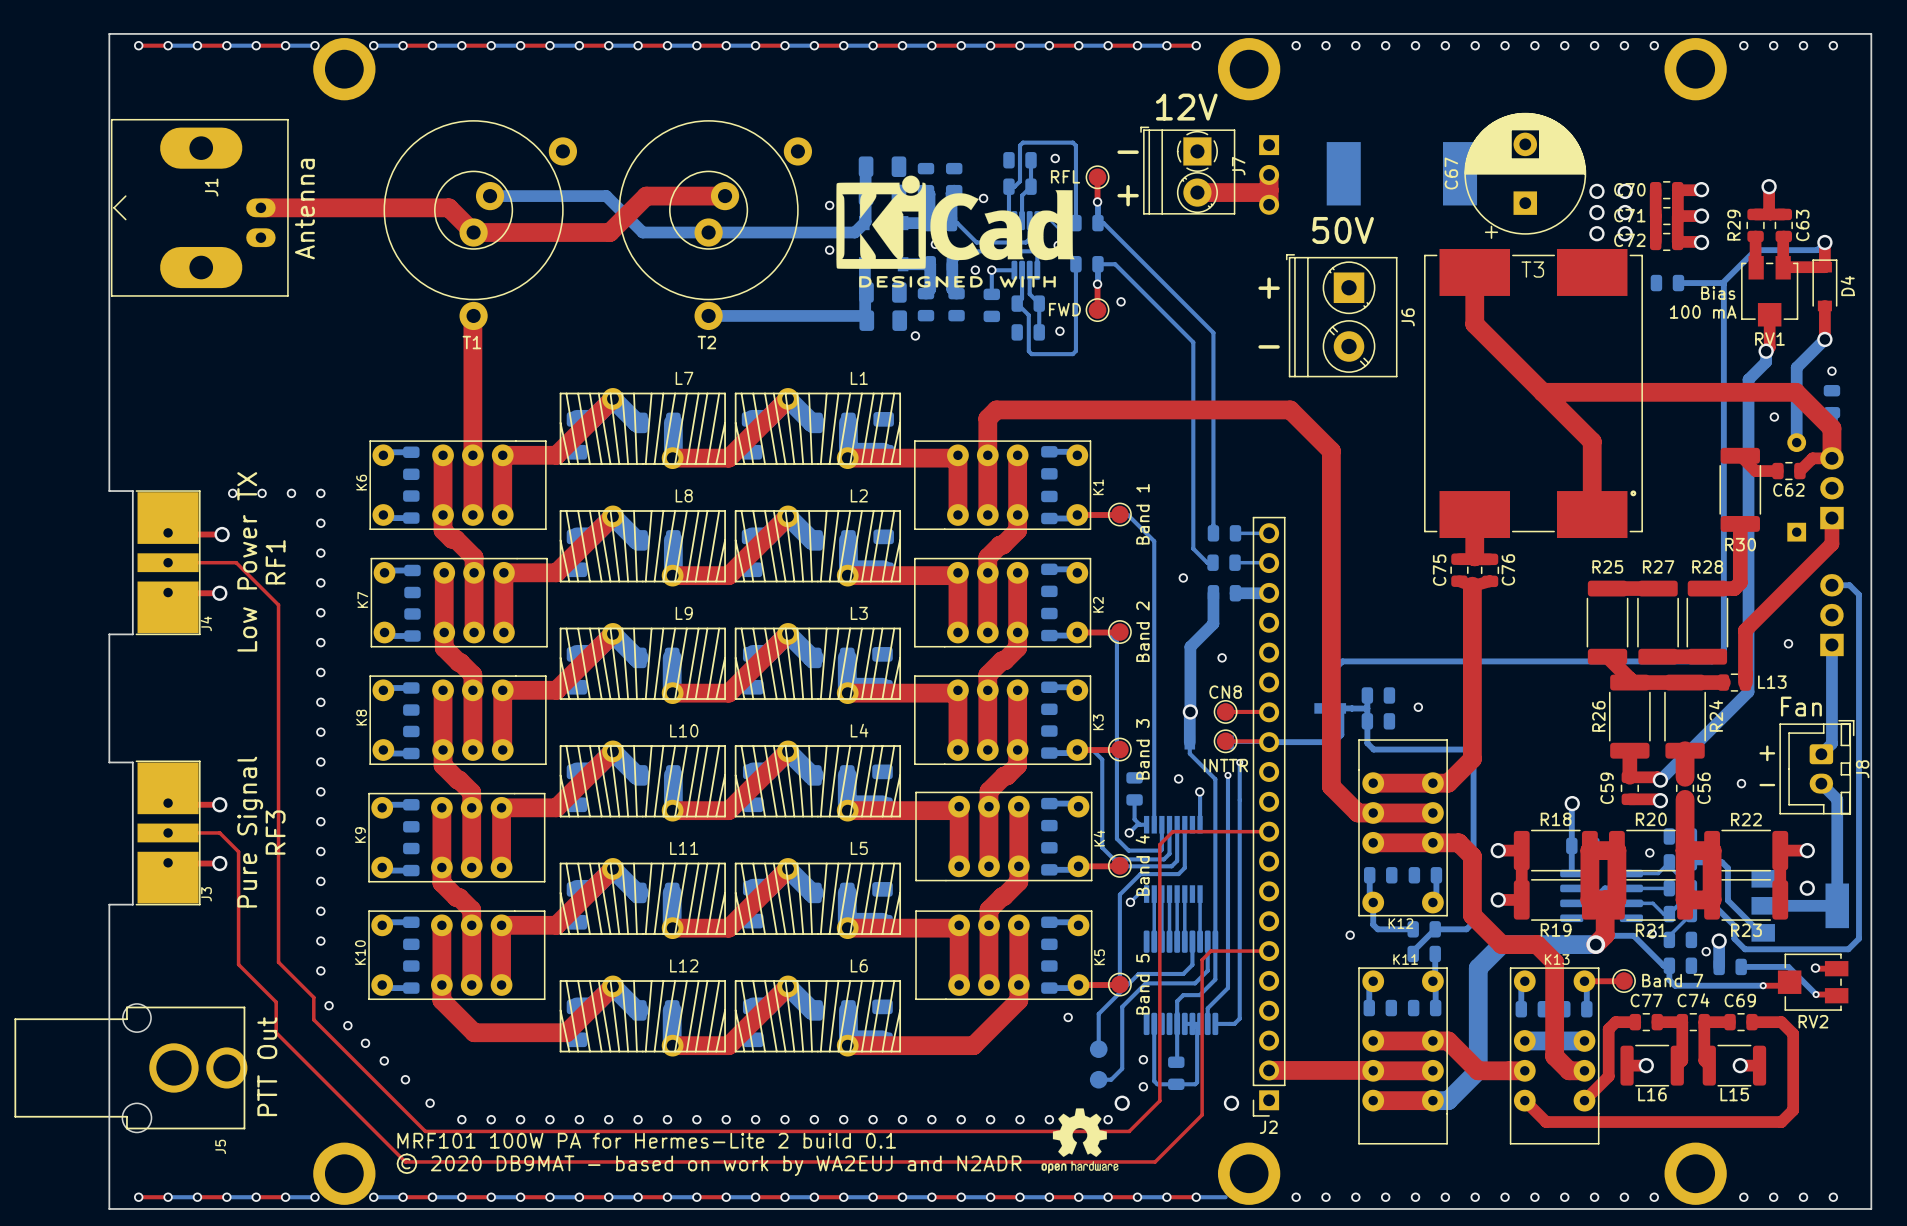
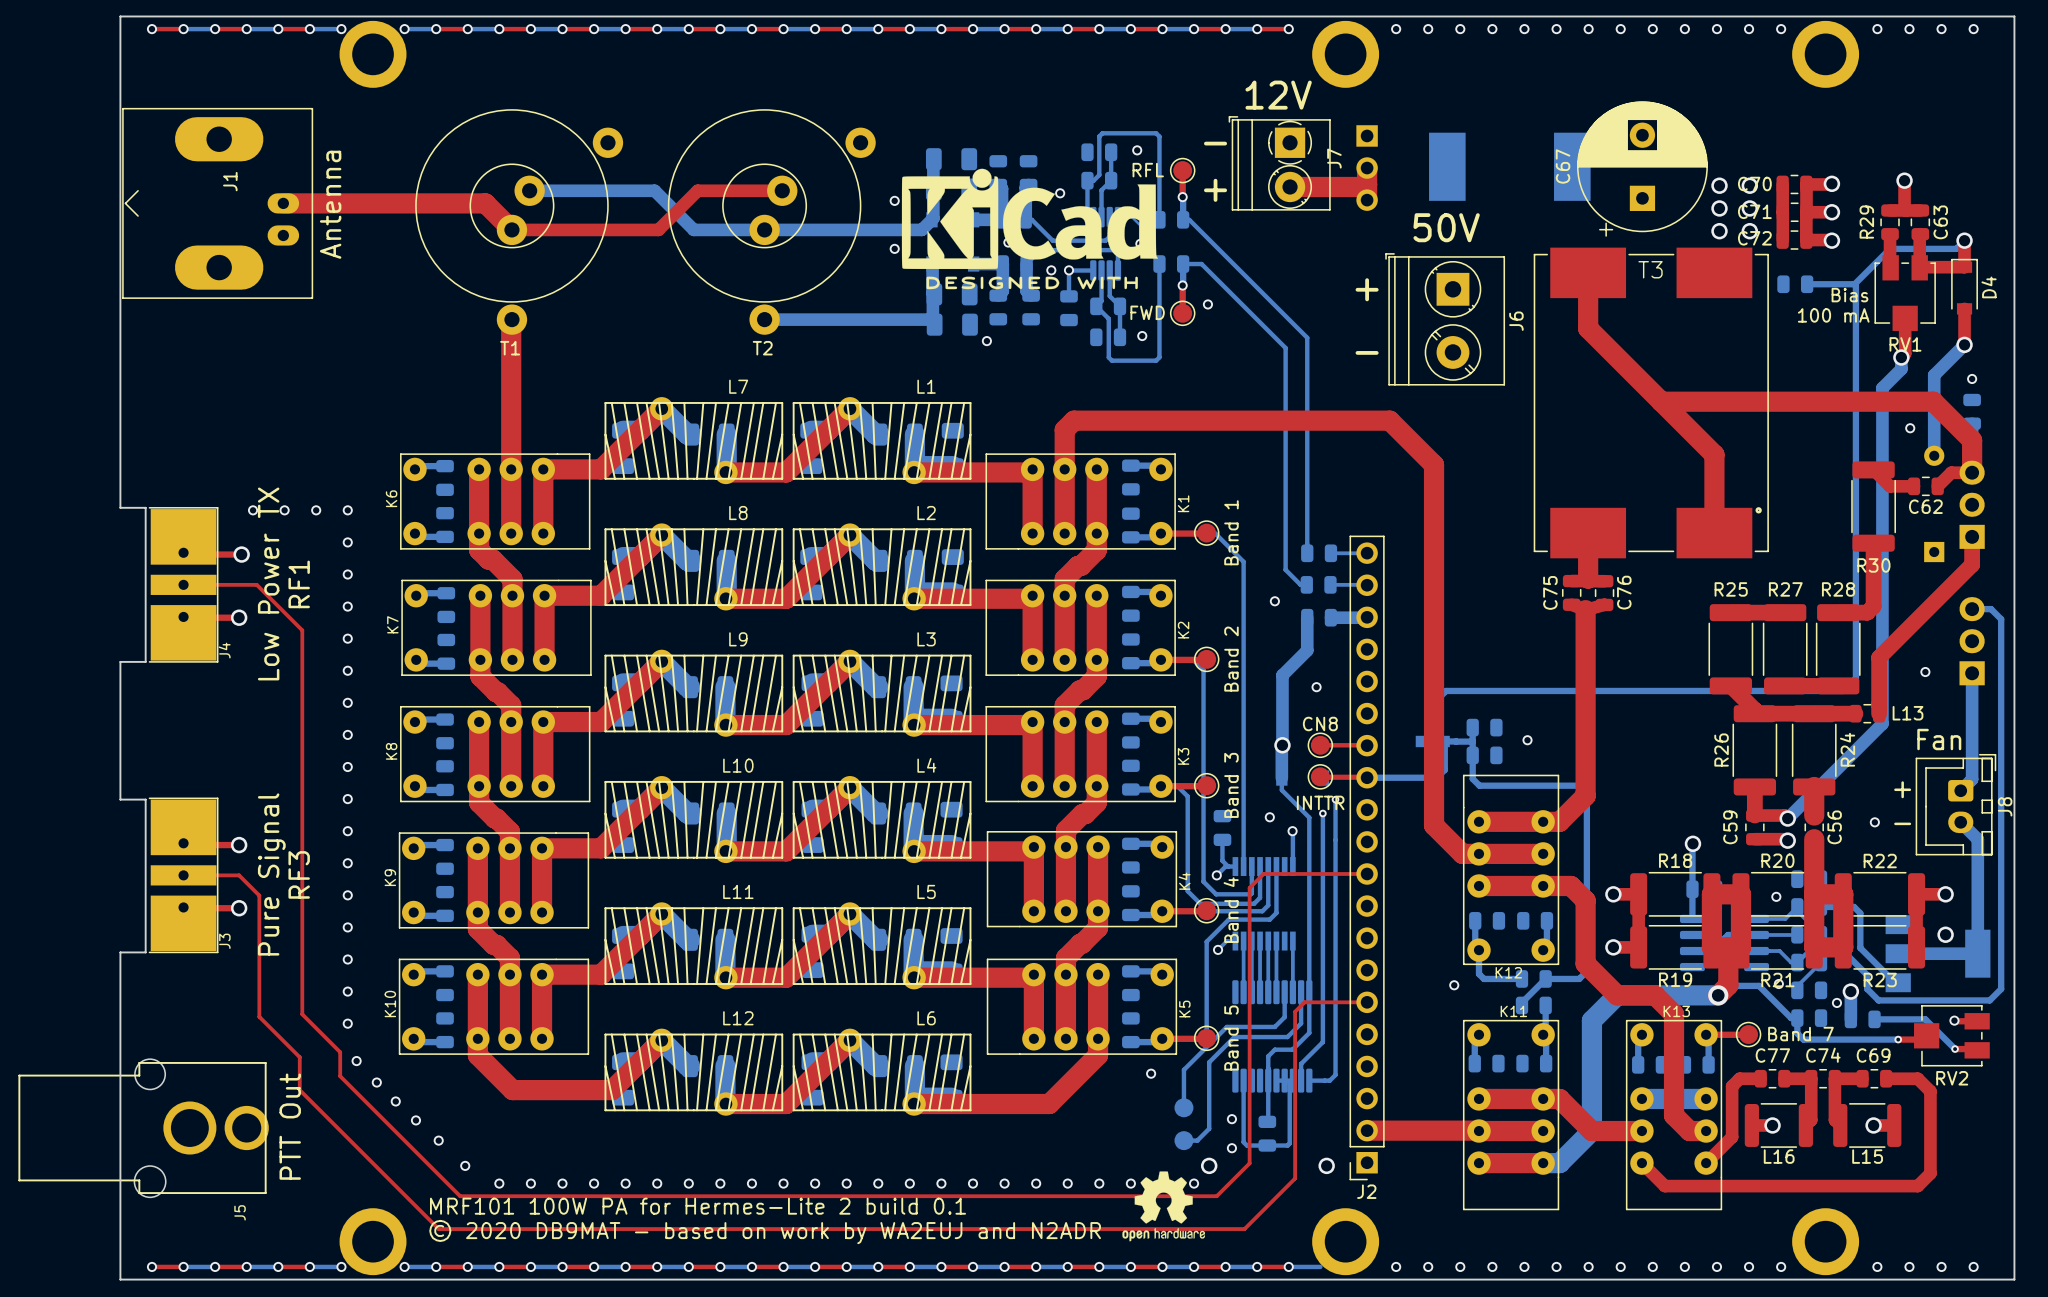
top track width: thick (725, 196) (646, 196) (609, 232) (473, 232) -> thin (782, 190) (697, 190) (658, 229) (511, 229)

